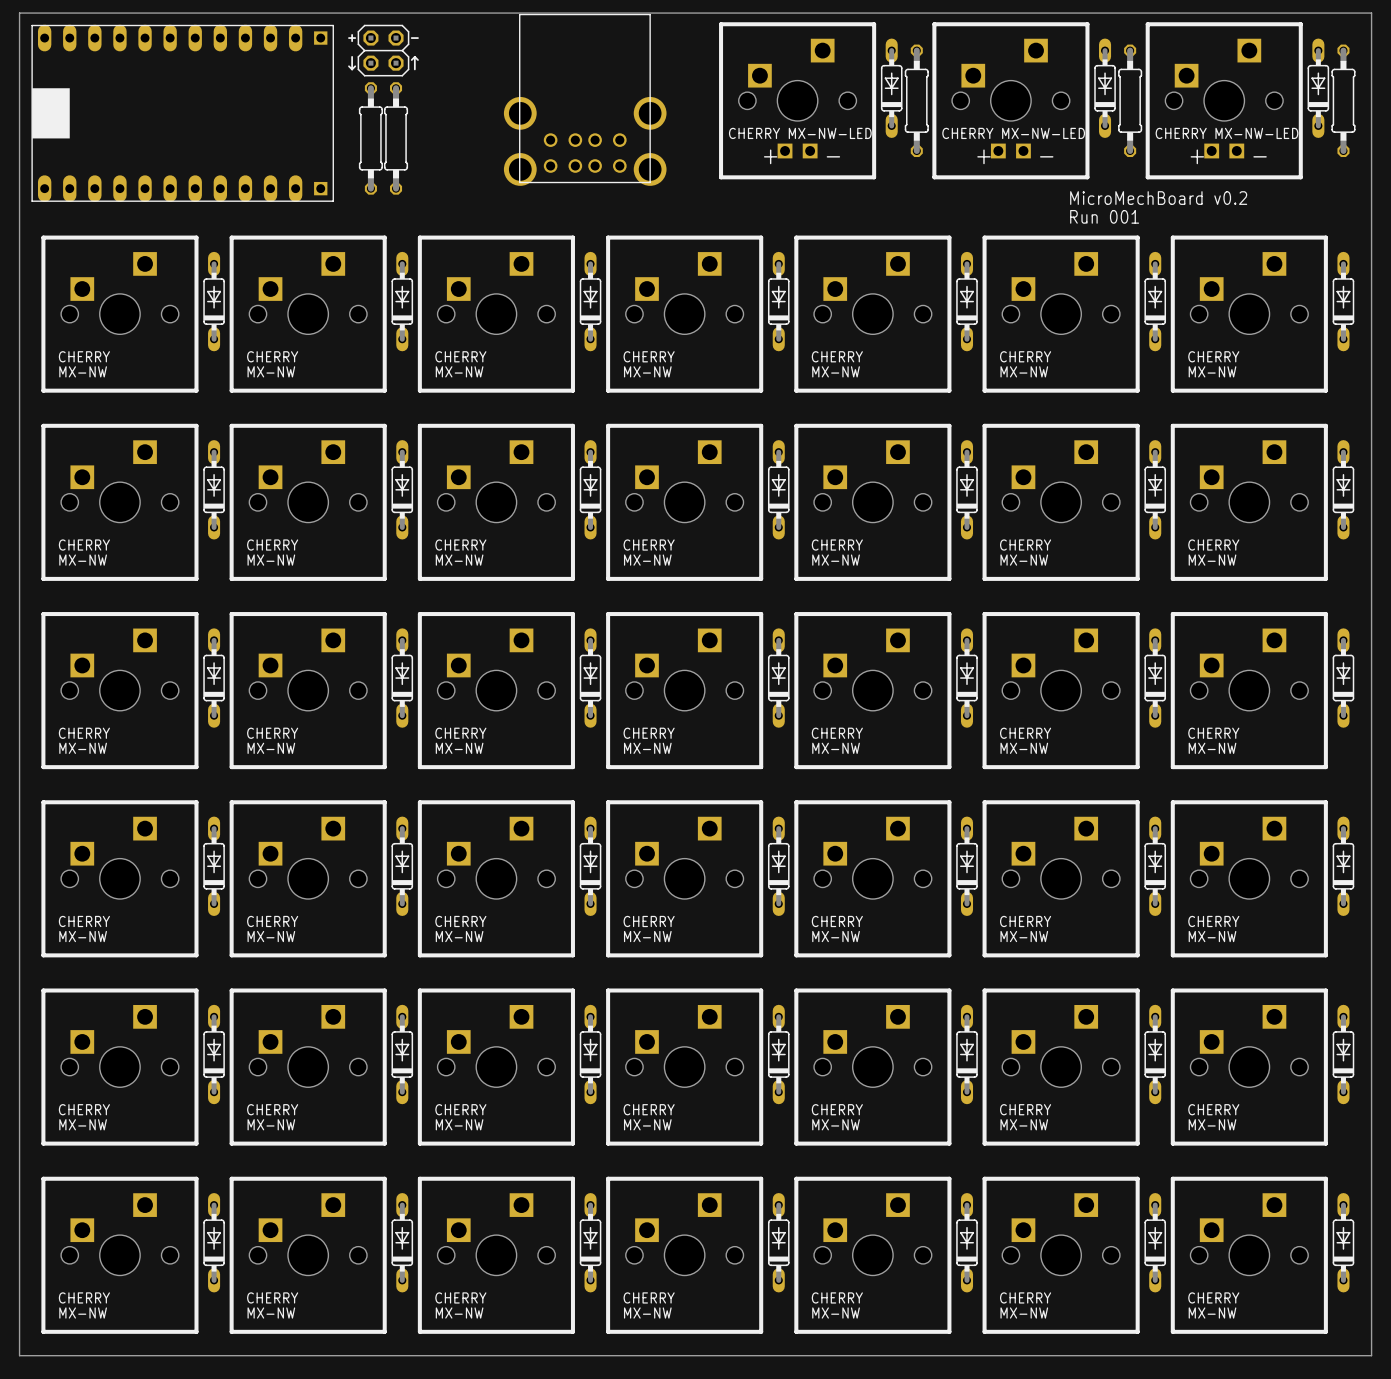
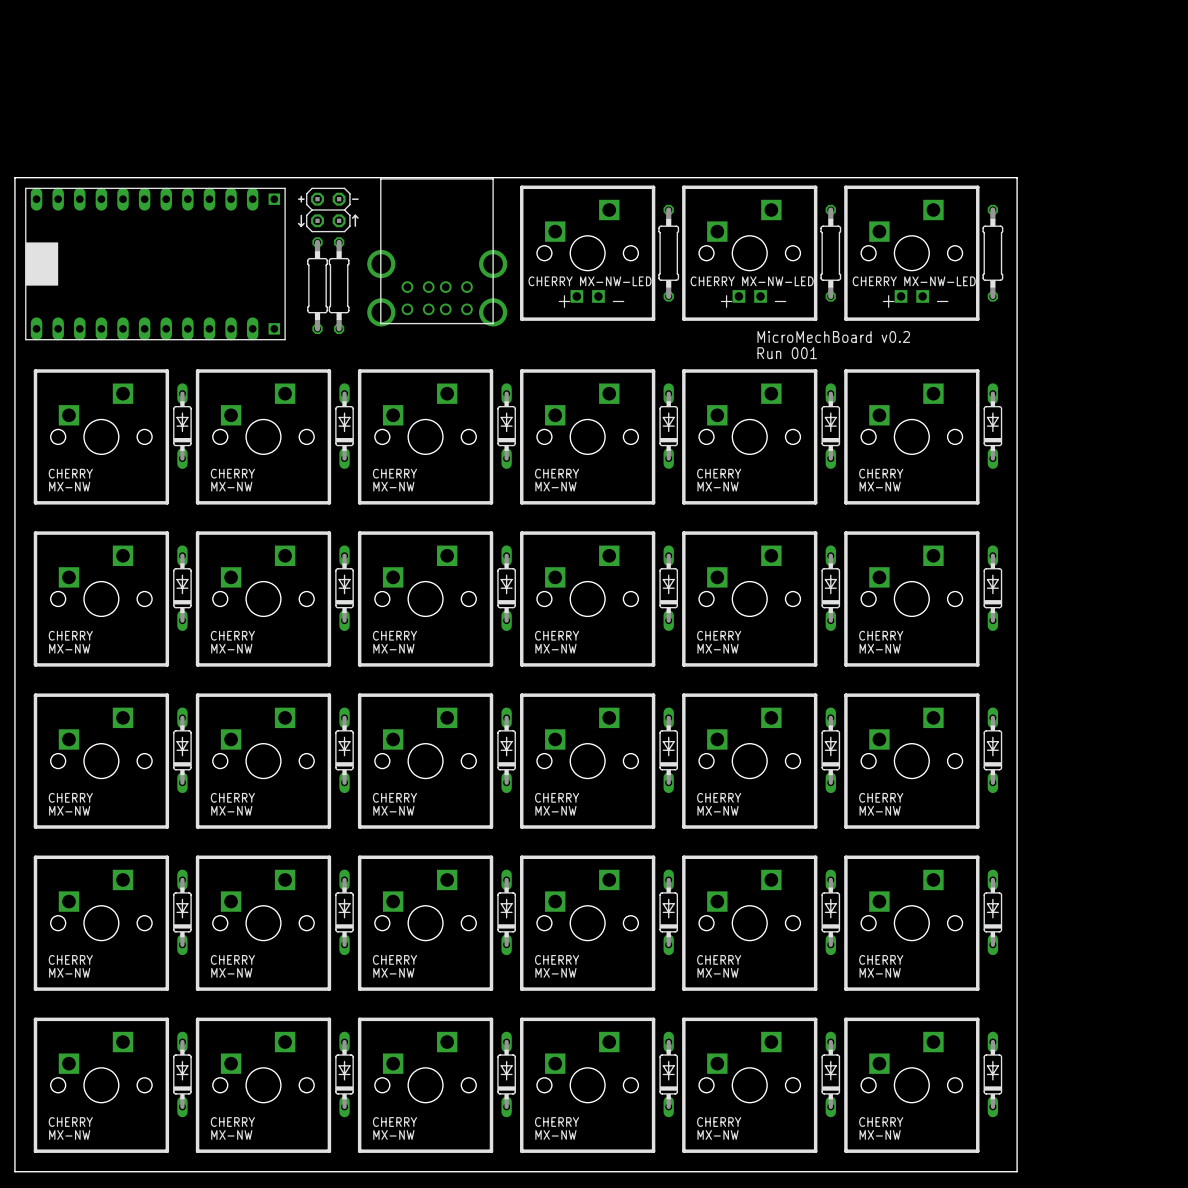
line: (352, 34) (352, 41) -> (301, 196) (301, 201)
line: (348, 38) (355, 38) -> (298, 199) (304, 199)
line: (411, 38) (417, 38) -> (352, 199) (358, 199)
part position: (383, 50) -> (328, 209)
line: (352, 56) (352, 69) -> (301, 215) (301, 226)
line: (414, 56) (411, 60) -> (355, 215) (352, 218)
line: (414, 56) (417, 60) -> (355, 215) (358, 218)
line: (414, 56) (414, 69) -> (355, 215) (355, 226)
line: (348, 66) (352, 69) -> (298, 223) (301, 226)
line: (355, 66) (352, 69) -> (304, 223) (301, 226)
part: (891, 88) -> none
part: (1105, 88) -> none
part: (1318, 88) -> none
part position: (585, 99) -> (437, 252)
part: (797, 100) -> none
part: (916, 100) -> none
part: (1010, 100) -> none
part: (1130, 100) -> none
part: (1224, 100) -> none
part: (1343, 100) -> none
part position: (182, 113) -> (155, 264)
part: (370, 138) -> none
part: (396, 138) -> none
text: MicroMechBoard v0.2 (1158, 198) -> none
board edge: (19, 201) (19, 13) (1371, 13) (1371, 1355) (1183, 1355) -> (14, 177) (1017, 177) (1017, 1171)
text: Run 001 (1104, 216) -> none
part: none -> (587, 253)
part: none -> (668, 253)
part: none -> (749, 253)
part: none -> (830, 253)
part: none -> (911, 253)
part: none -> (992, 253)
part: (214, 301) -> none
part: (402, 301) -> none
part: (590, 301) -> none
part: (778, 301) -> none
part: (966, 301) -> none
part: (1155, 301) -> none
part: (1343, 301) -> none
part: (119, 314) -> none
part: (308, 314) -> none
part: (496, 314) -> none
part: (684, 314) -> none
part: (872, 314) -> none
part: (1061, 314) -> none
part: (1249, 314) -> none
part: none -> (317, 285)
part: none -> (339, 285)
text: none -> MicroMechBoard v0.2 (833, 336)
text: none -> Run 001 (787, 353)
part: (1343, 489) -> none
part: (1249, 502) -> none
part: (1343, 678) -> none
part: (1249, 690) -> none
part: (1343, 866) -> none
part: (1249, 878) -> none
part: (1343, 1054) -> none
part: (1249, 1067) -> none
part: (1343, 1242) -> none
part: (1249, 1255) -> none

